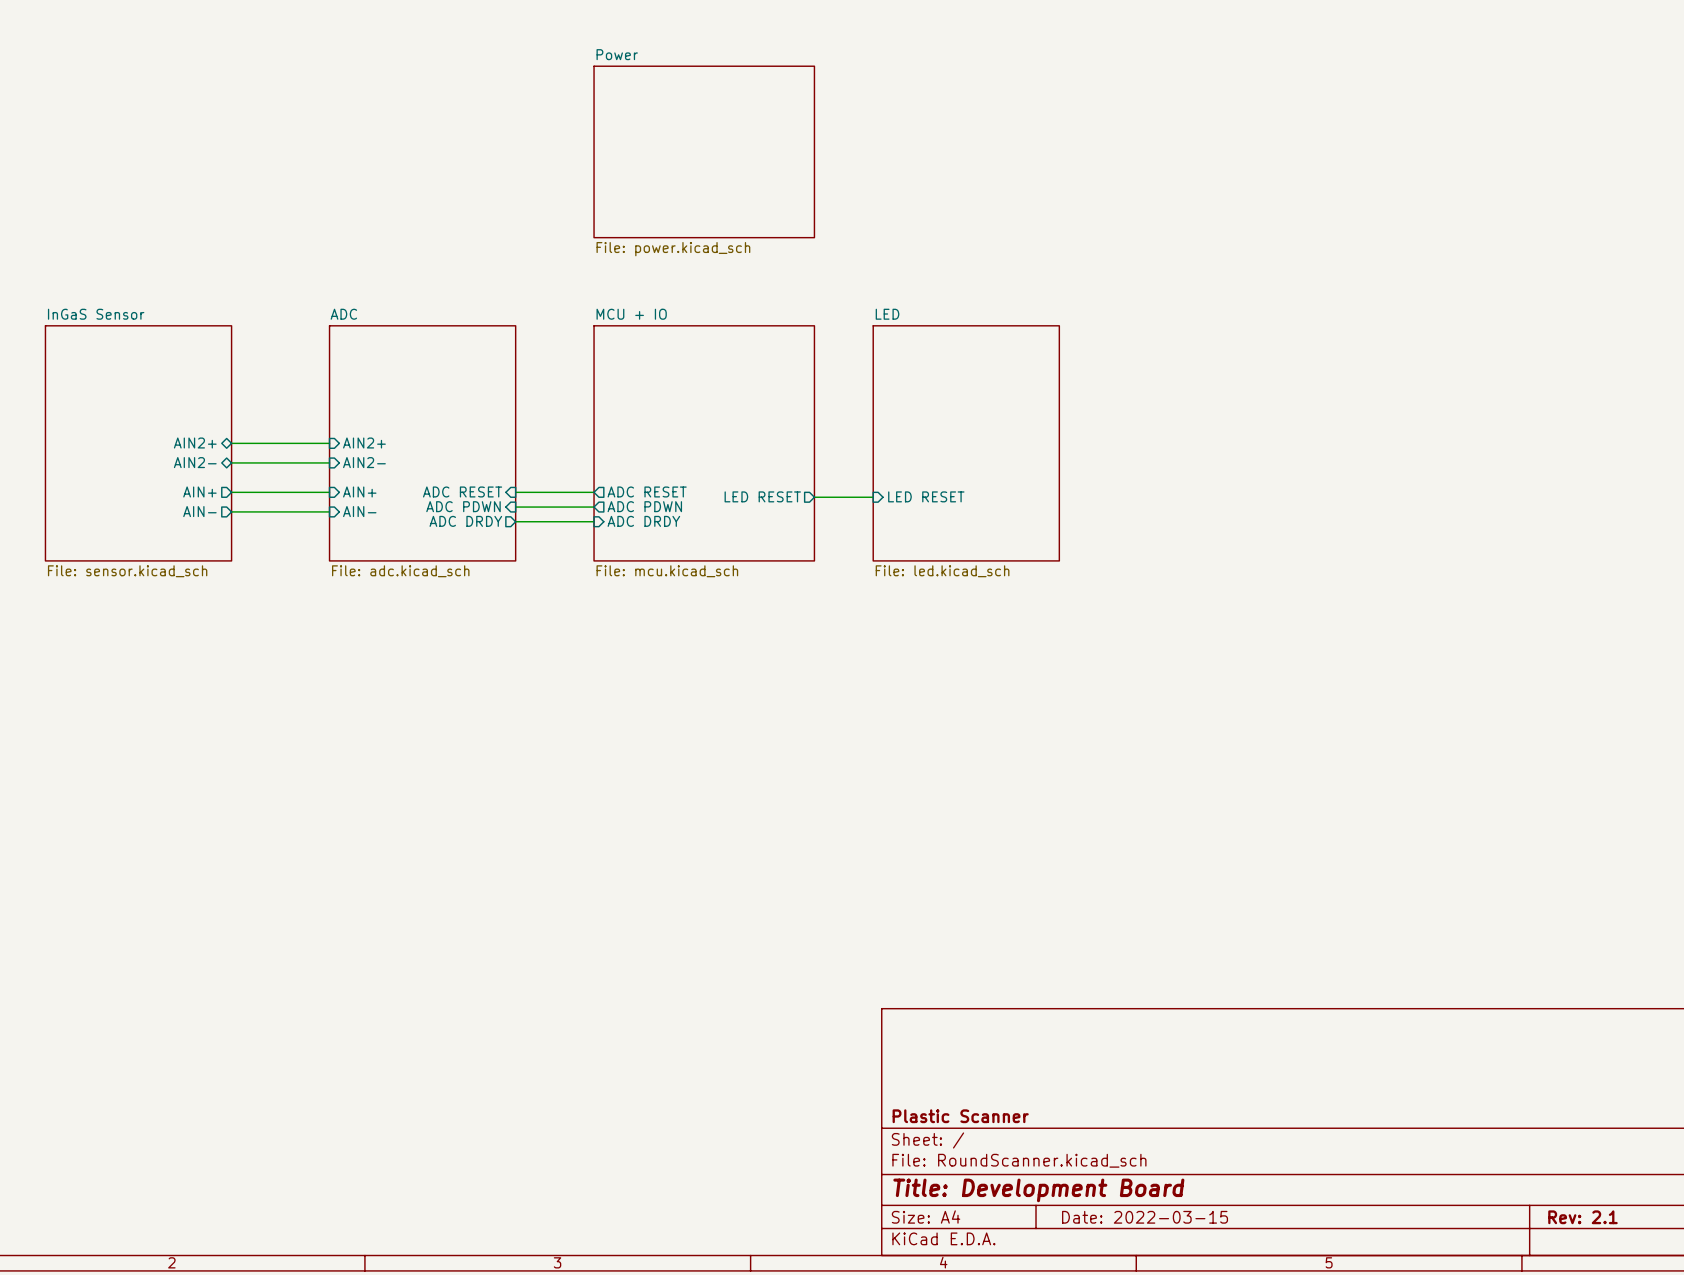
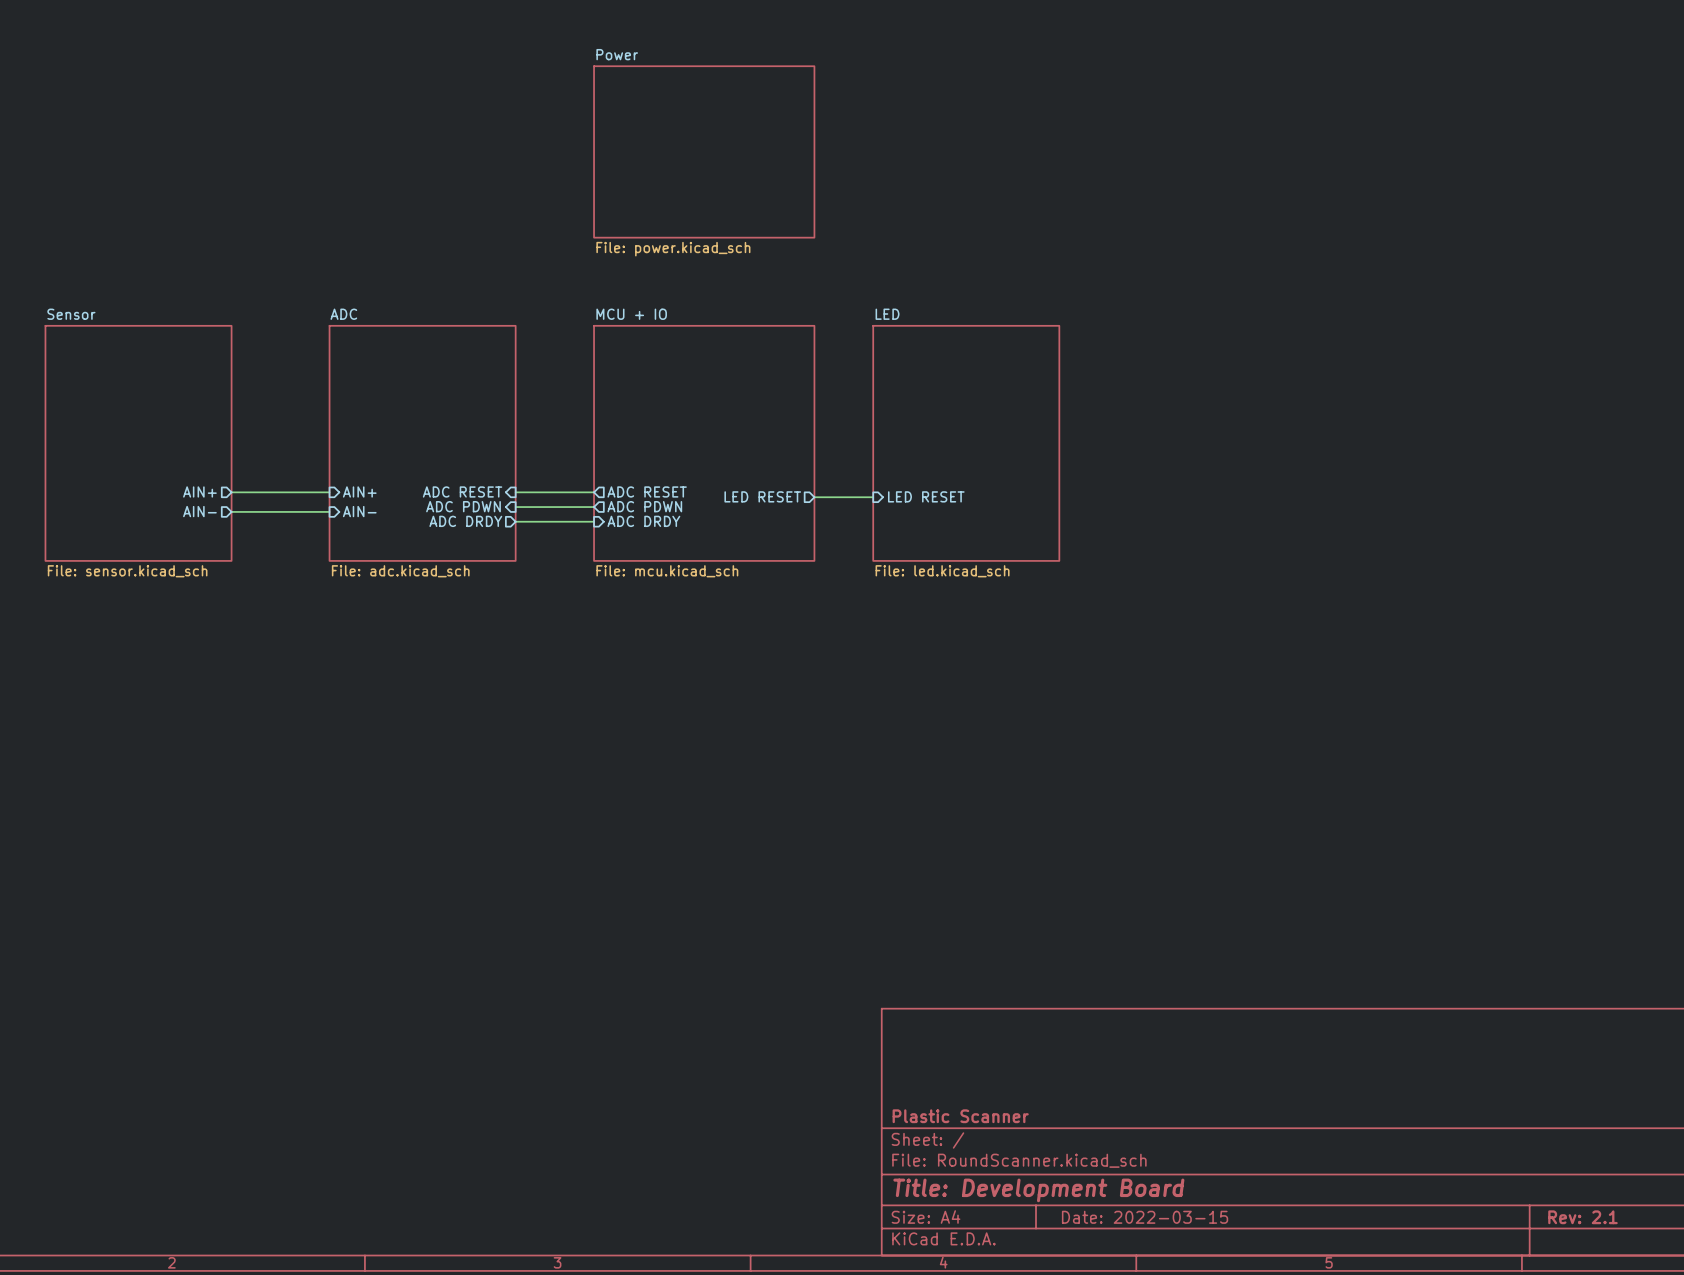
sheet InGaS Sensor name: InGaS Sensor (96, 314) -> Sensor (71, 314)
sheet pin: AIN2+ (195, 443) -> none
wire: (231, 443) (329, 443) -> none
sheet pin: AIN2+ (364, 443) -> none
sheet pin: AIN2- (195, 462) -> none
wire: (231, 462) (329, 462) -> none
sheet pin: AIN2- (364, 462) -> none

